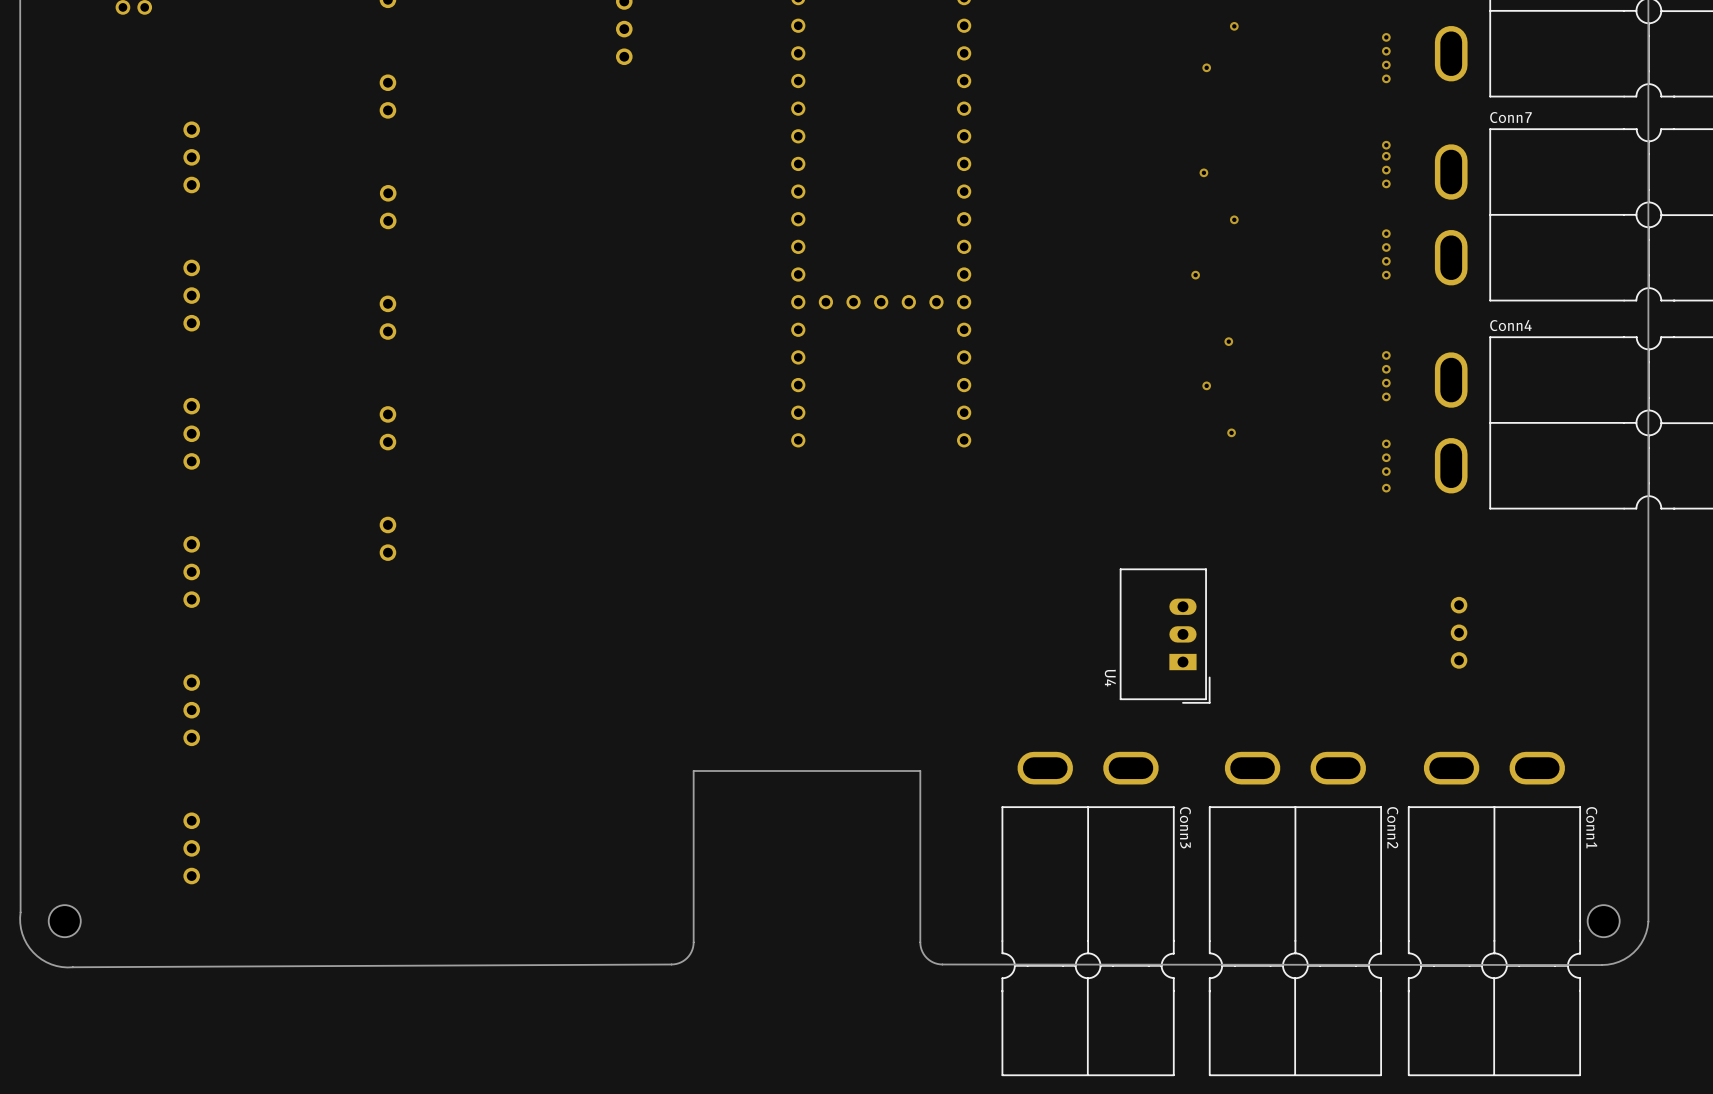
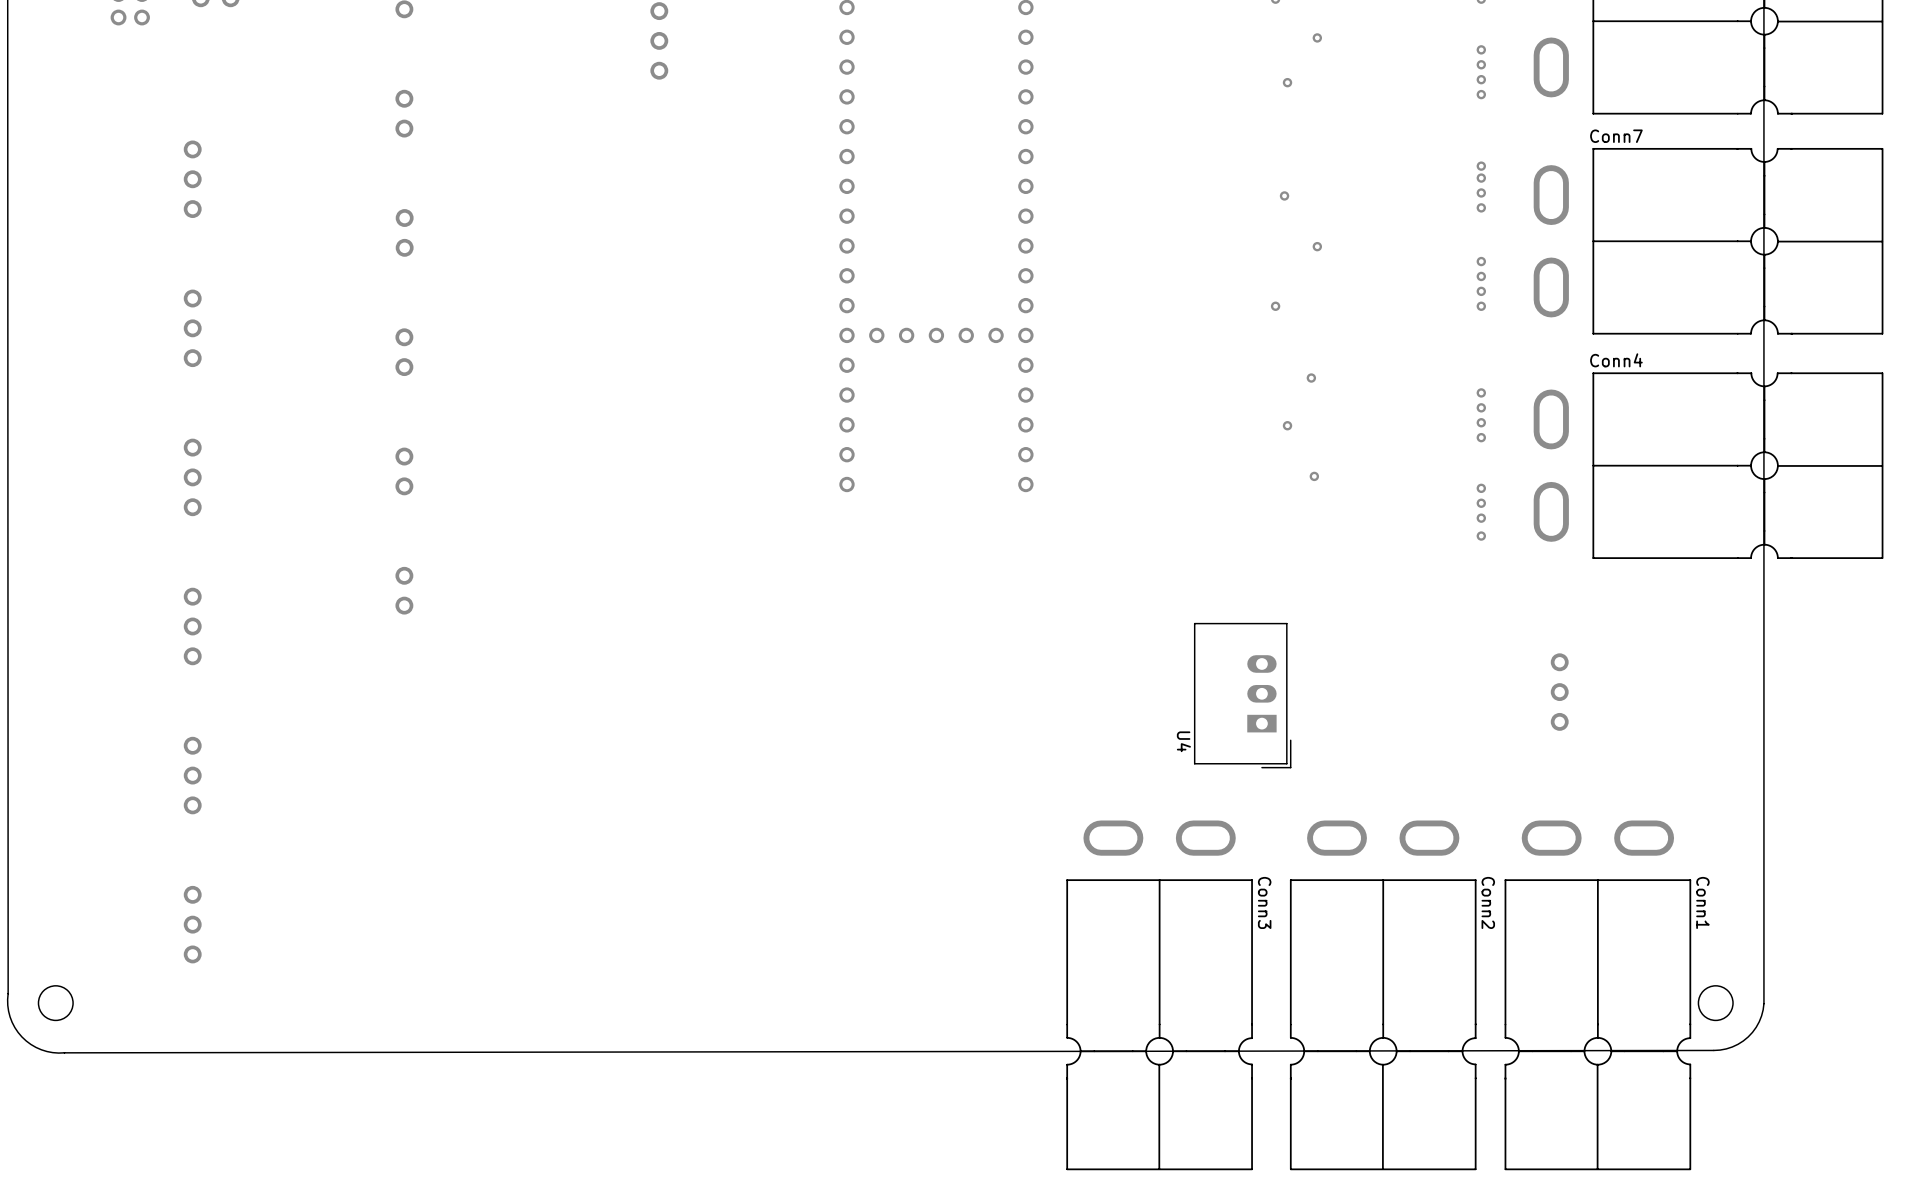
board edge: (1601, 965) (937, 963) (925, 956) (920, 944) (920, 771) (693, 771) (693, 944) (688, 956) (678, 963) (72, 967) -> (1713, 1050) (64, 1052)

